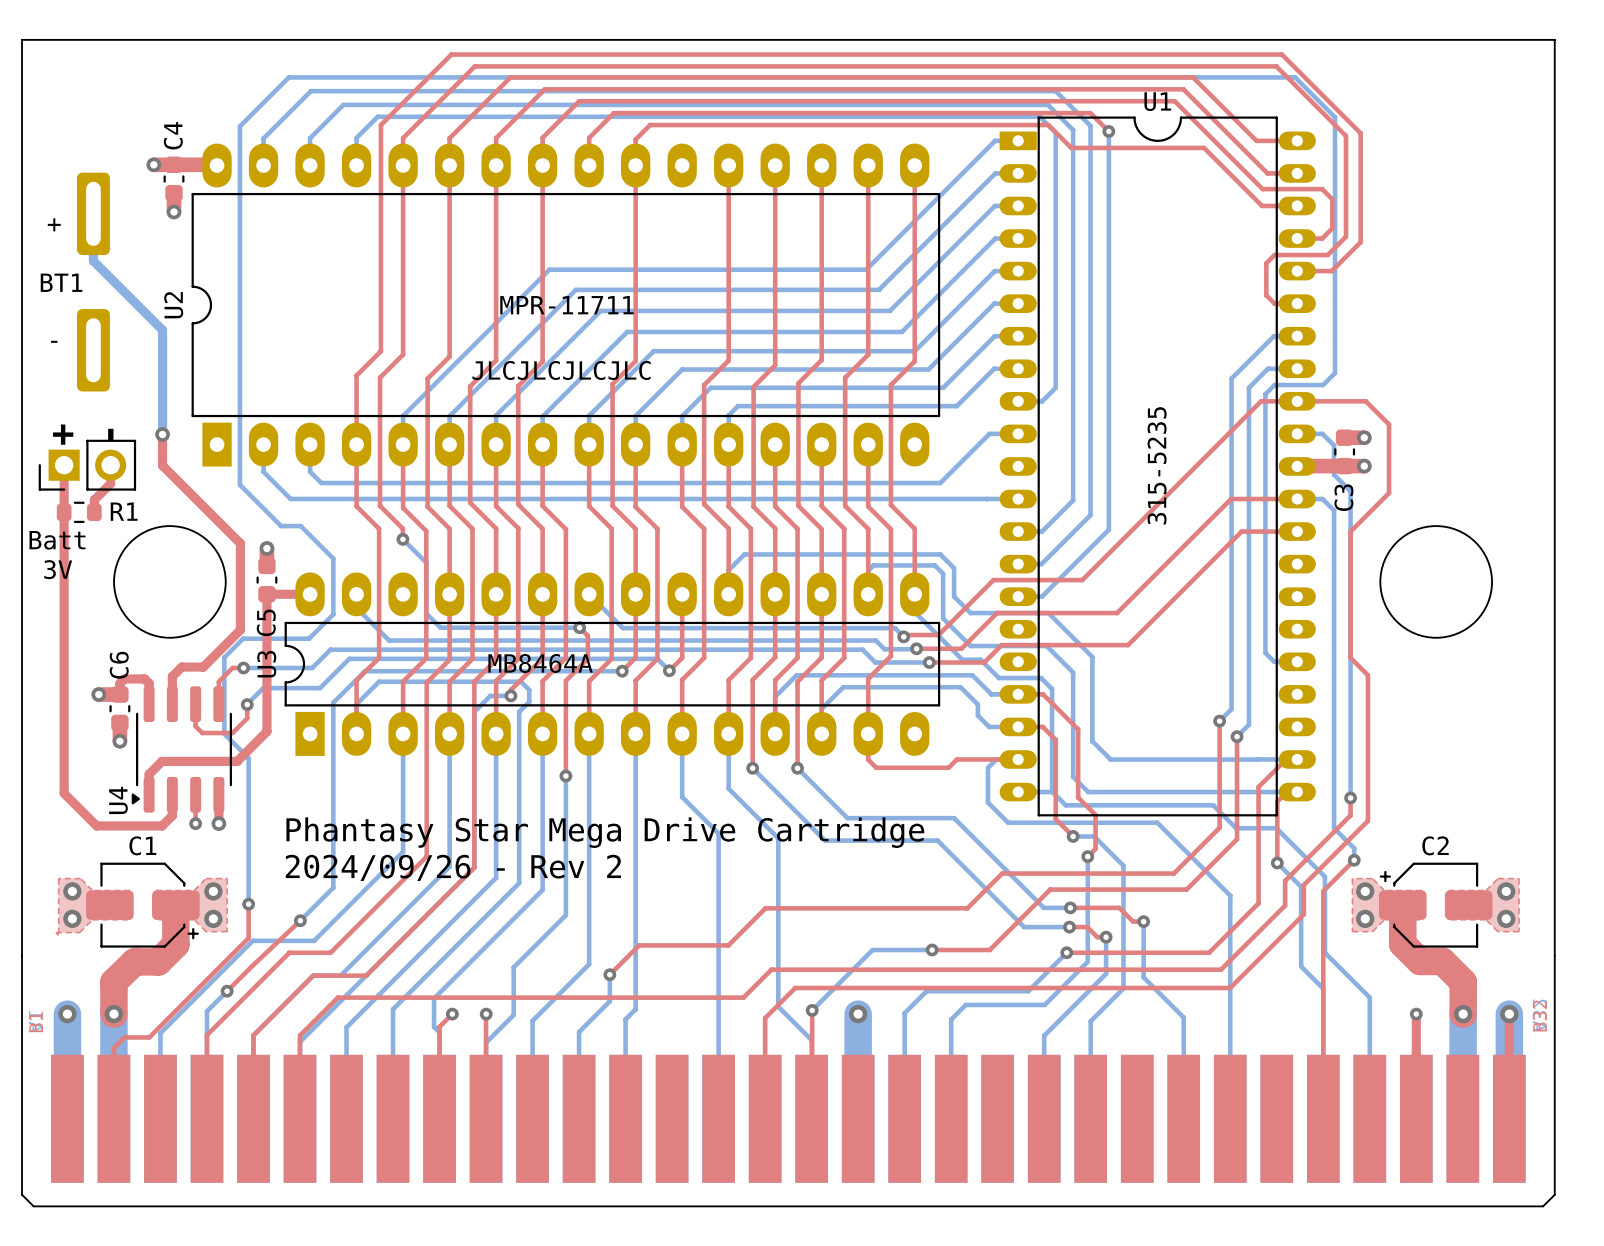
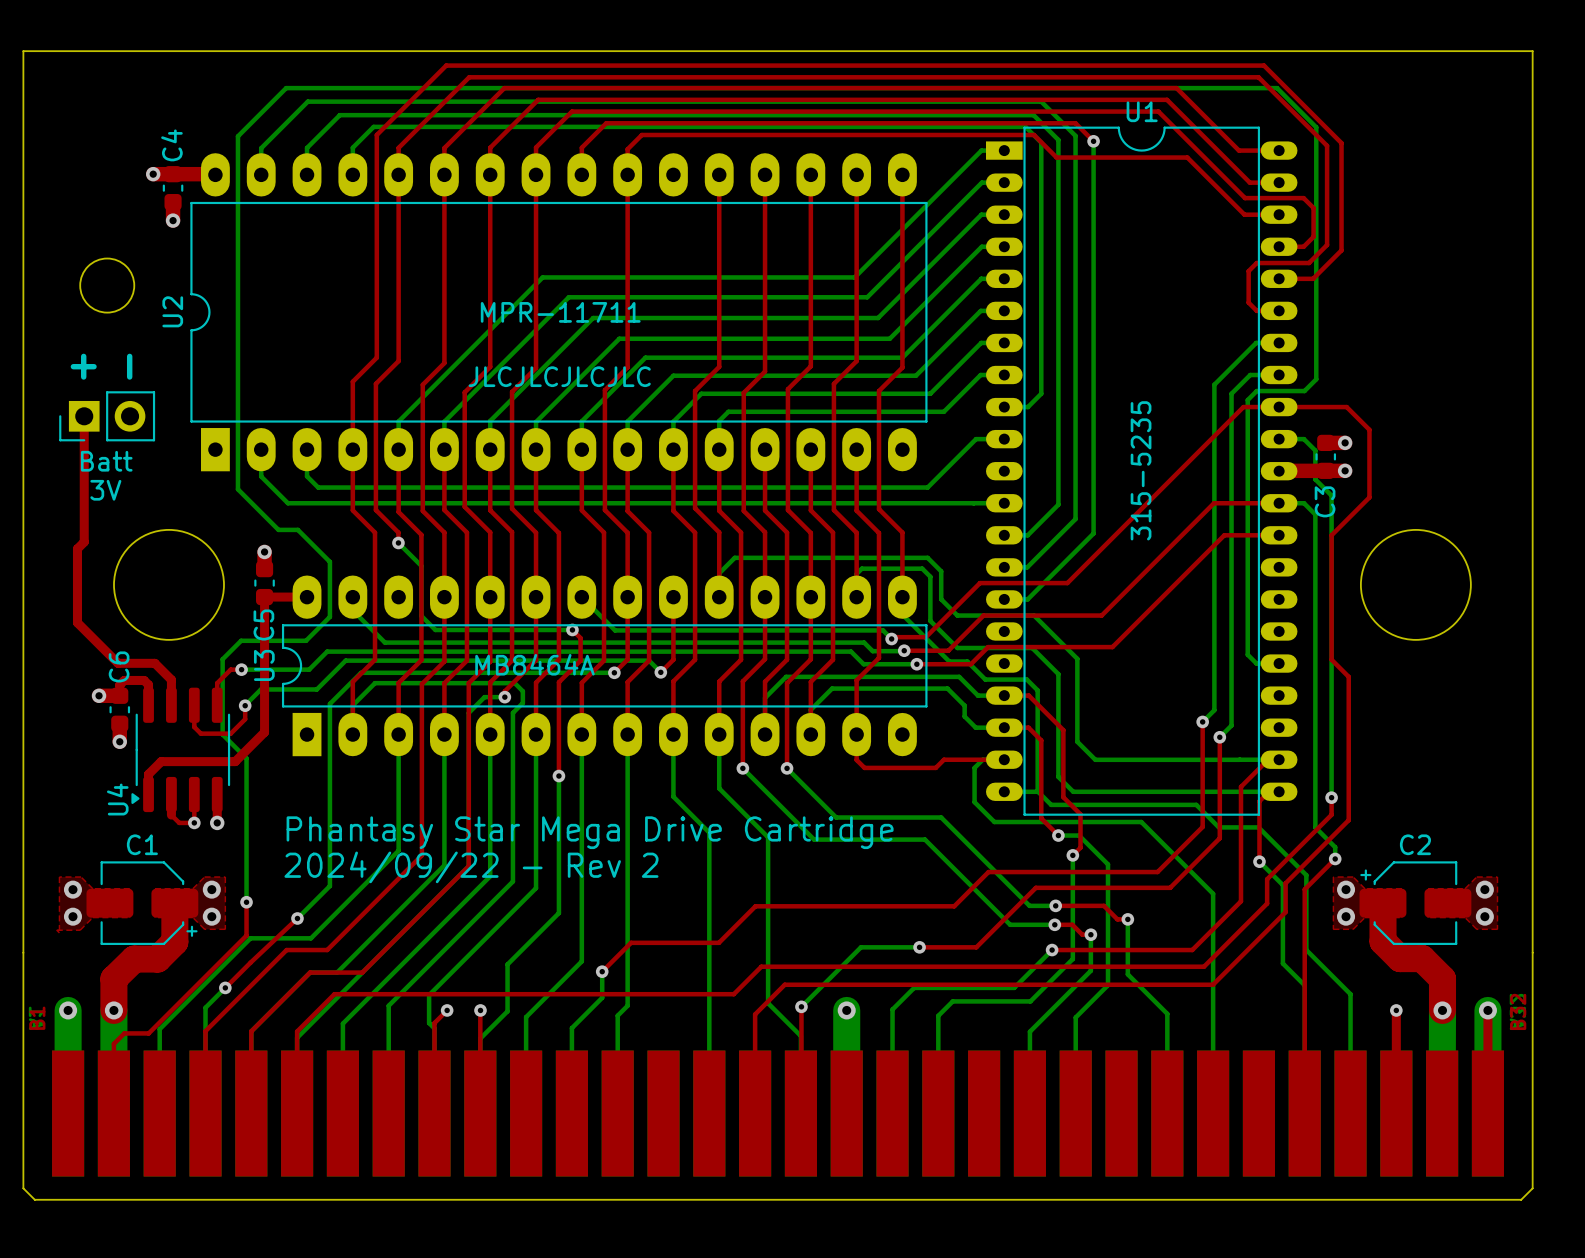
bottom track: (93, 213) (93, 261) (162, 330) (162, 434) -> none
text: + (54, 224) -> none
round board edge: none -> [79, 257, 136, 314]
BT1: (93, 282) -> none
text: - (54, 341) -> none
text: none -> - (129, 366)
text position: + (63, 434) -> + (83, 366)
text: - (110, 434) -> none
top track: (162, 434) (162, 465) (240, 543) (240, 630) (203, 667) (181, 667) (172, 678) -> (84, 416) (84, 542) (77, 548) (77, 622) (118, 663) (154, 663) (171, 679)
via: (162, 434) -> none
top track: (64, 465) (64, 793) (96, 825) (162, 825) (172, 815) -> (194, 822) (179, 822) (171, 815)
part position: (87, 465) -> (107, 416)
top track: (110, 465) (110, 483) (94, 499) (94, 512) -> none
R1: (79, 512) -> none
text position: Batt (57, 540) -> Batt (106, 461)
text position: 3V (58, 569) -> 3V (105, 490)
text: 2024/09/26 - Rev 2 (453, 867) -> 2024/09/22 - Rev 2 (471, 867)

